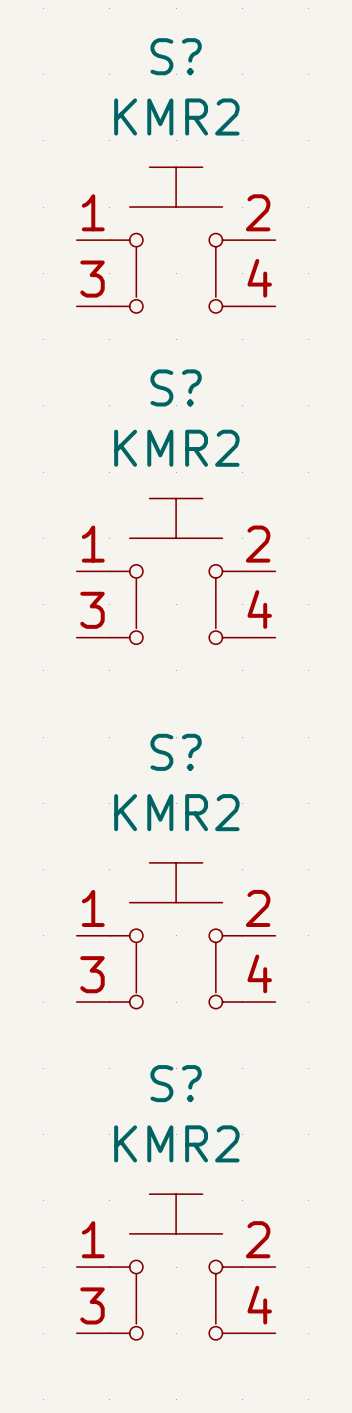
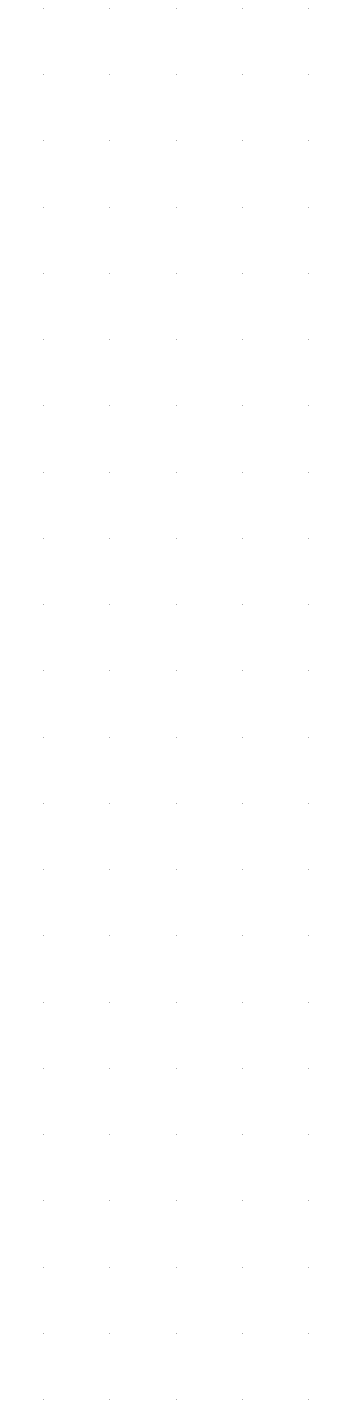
S?: KMR2 (176, 240) -> none
S?: KMR2 (176, 571) -> none
S?: KMR2 (176, 935) -> none
S?: KMR2 (176, 1267) -> none

